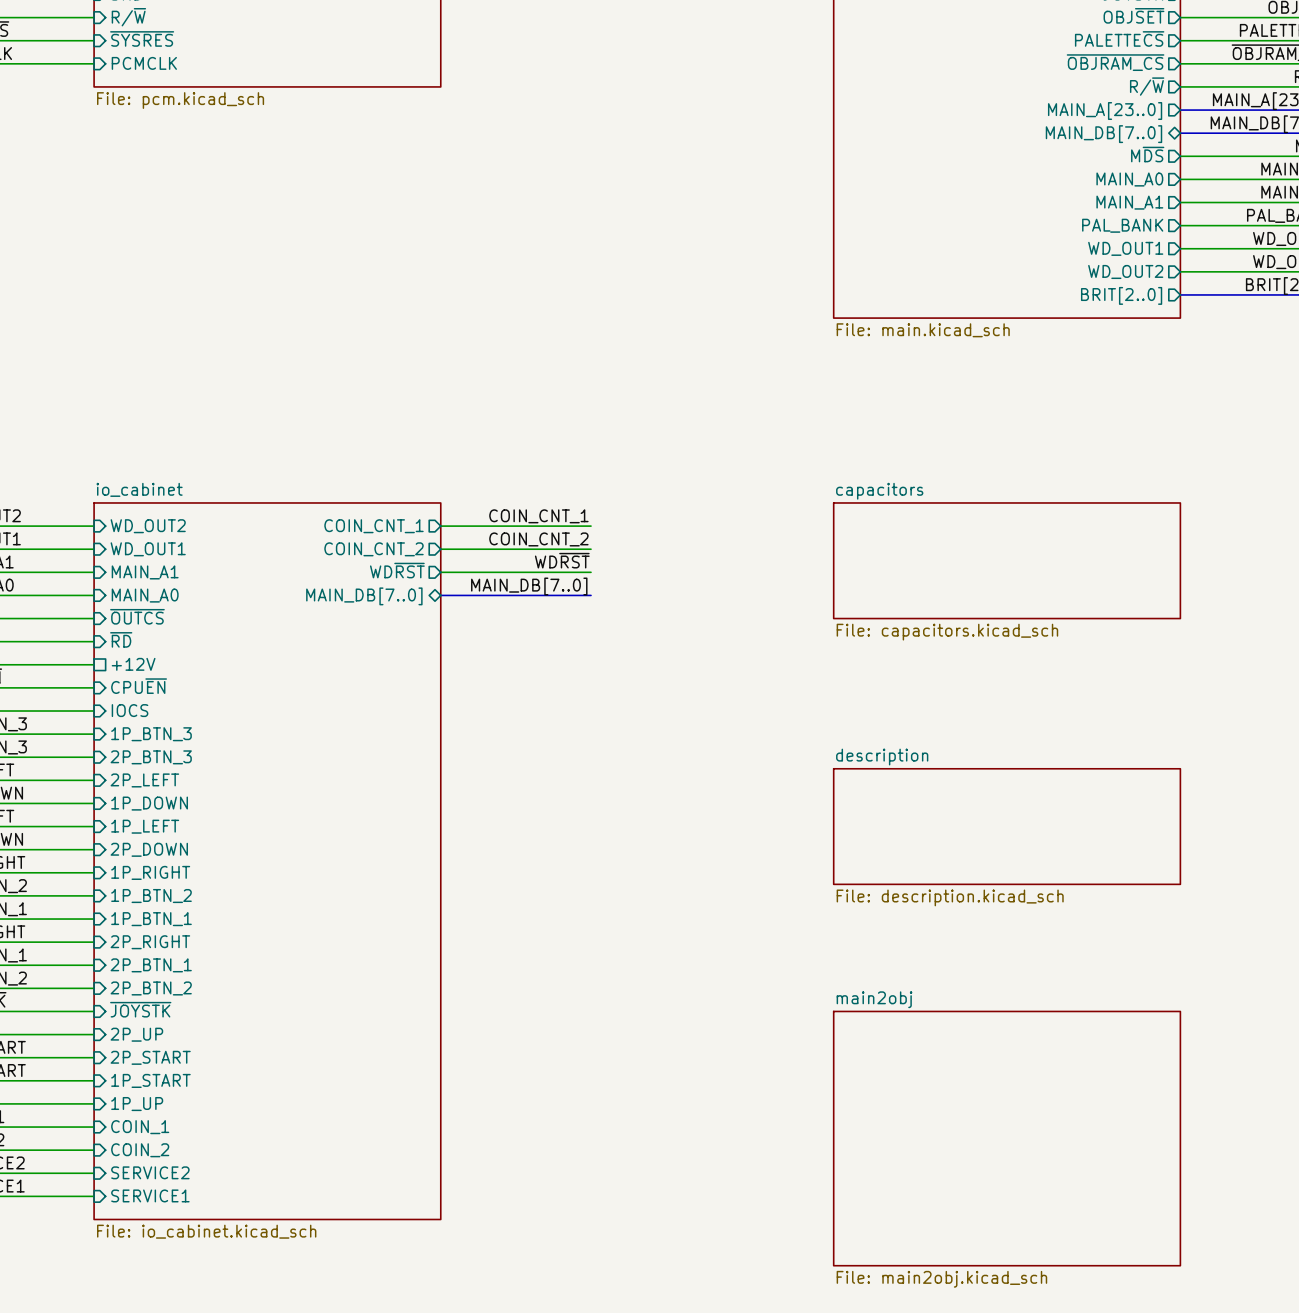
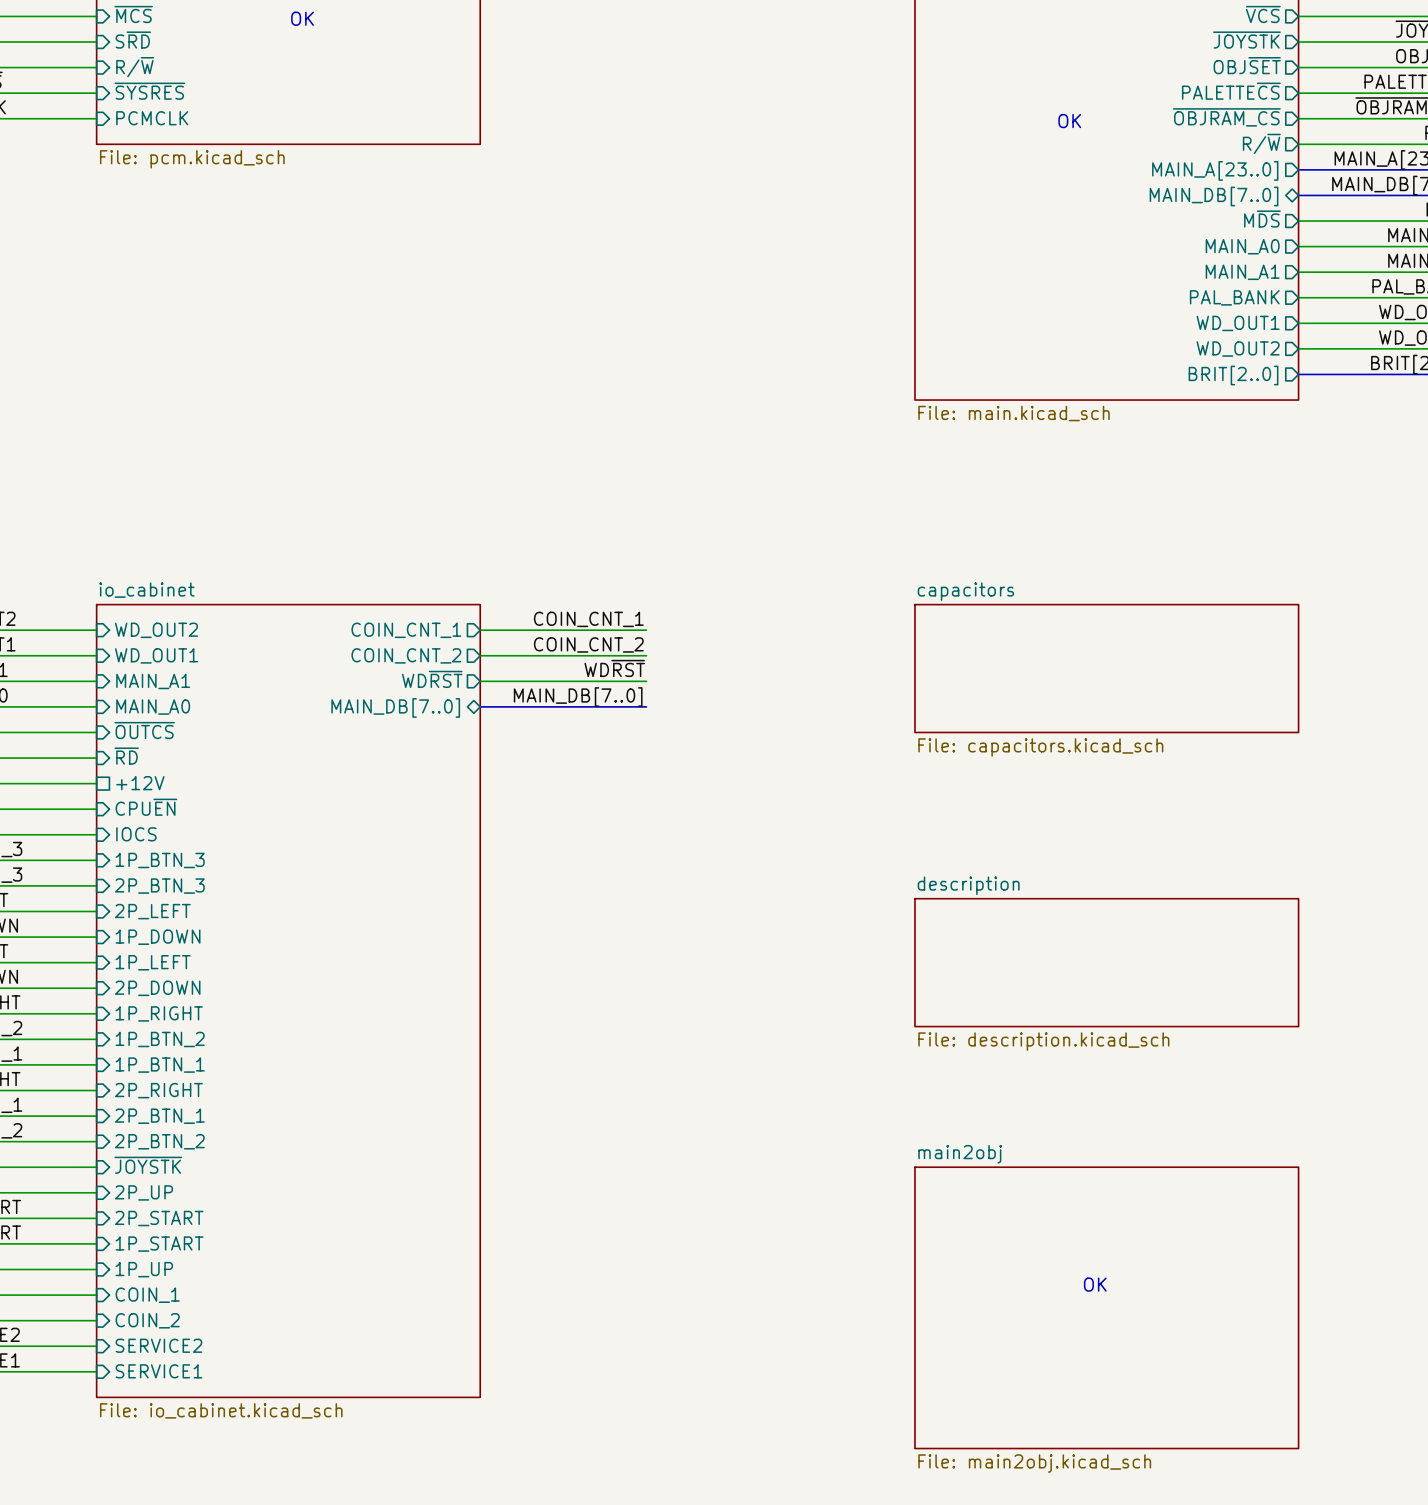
text: none -> OK (1069, 121)
text: none -> OK (1095, 1284)

